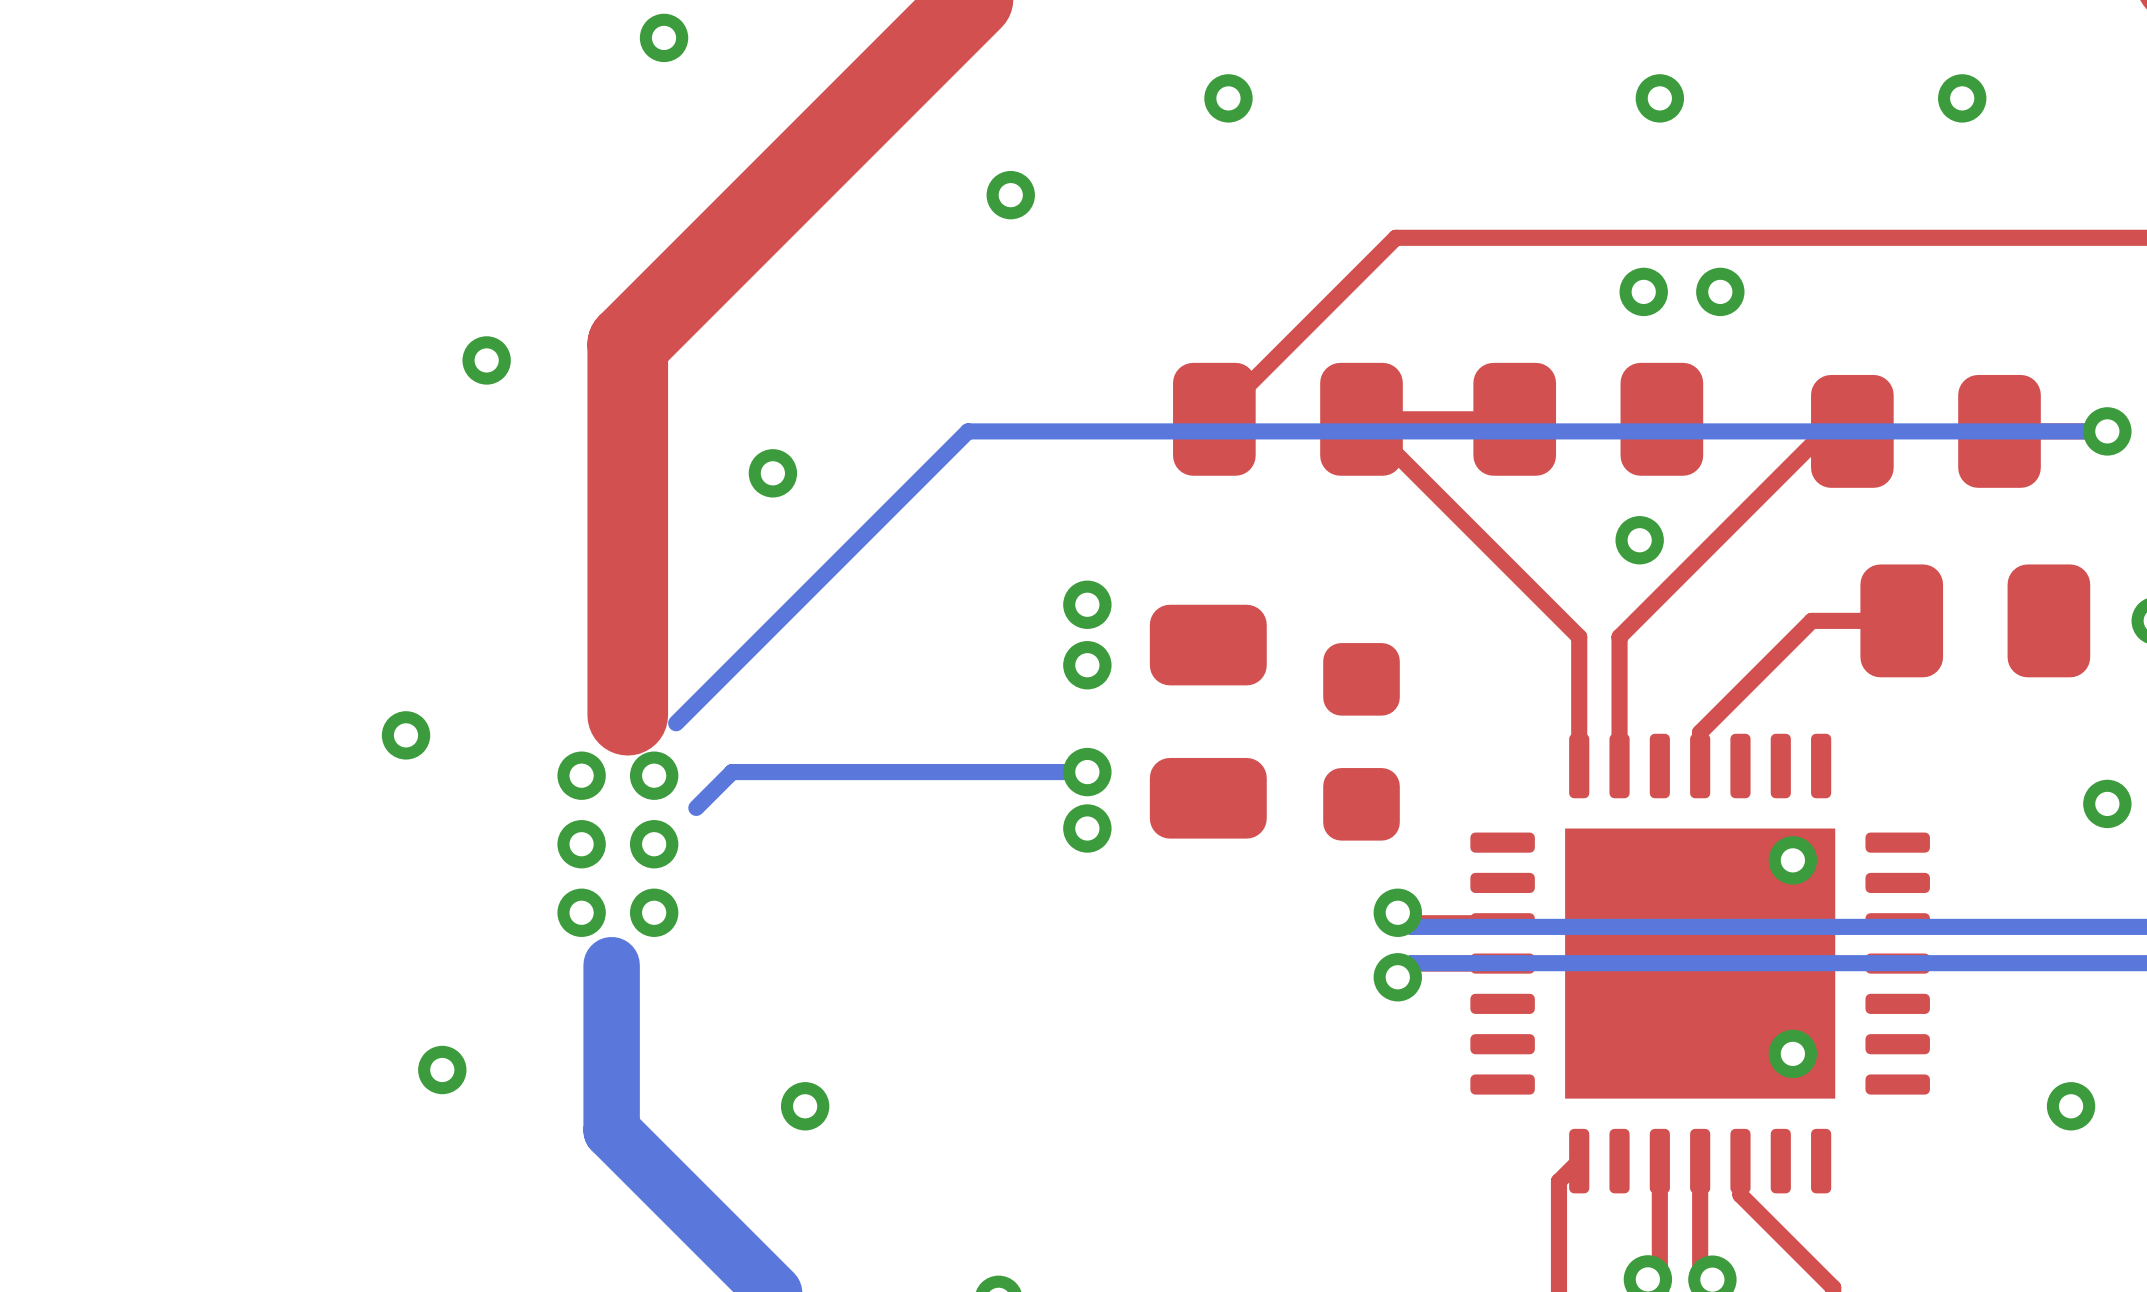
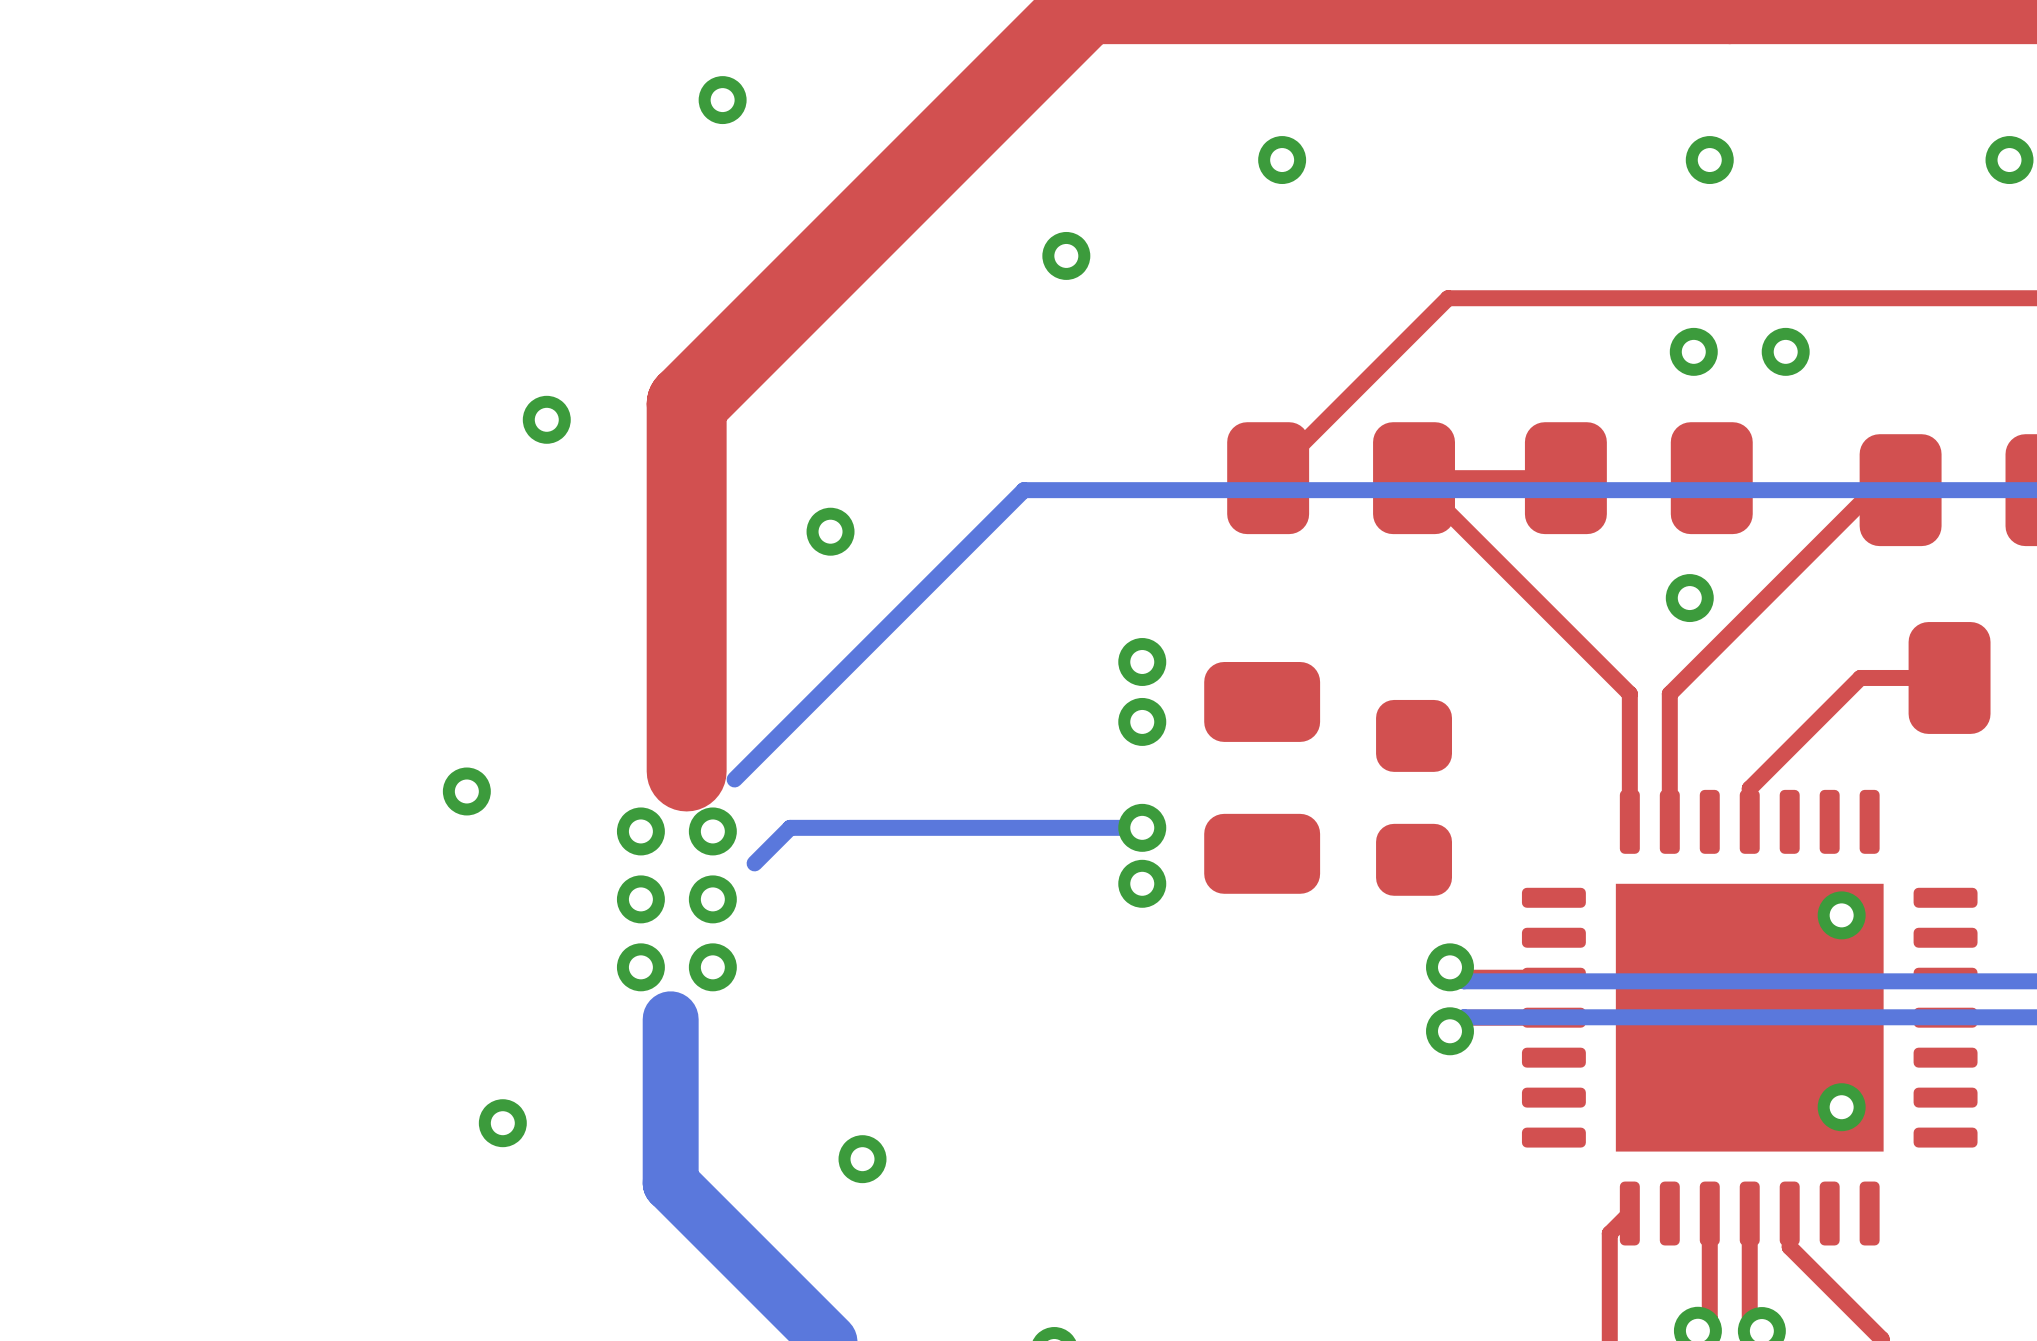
via position: (1720, 291) -> (1785, 351)

